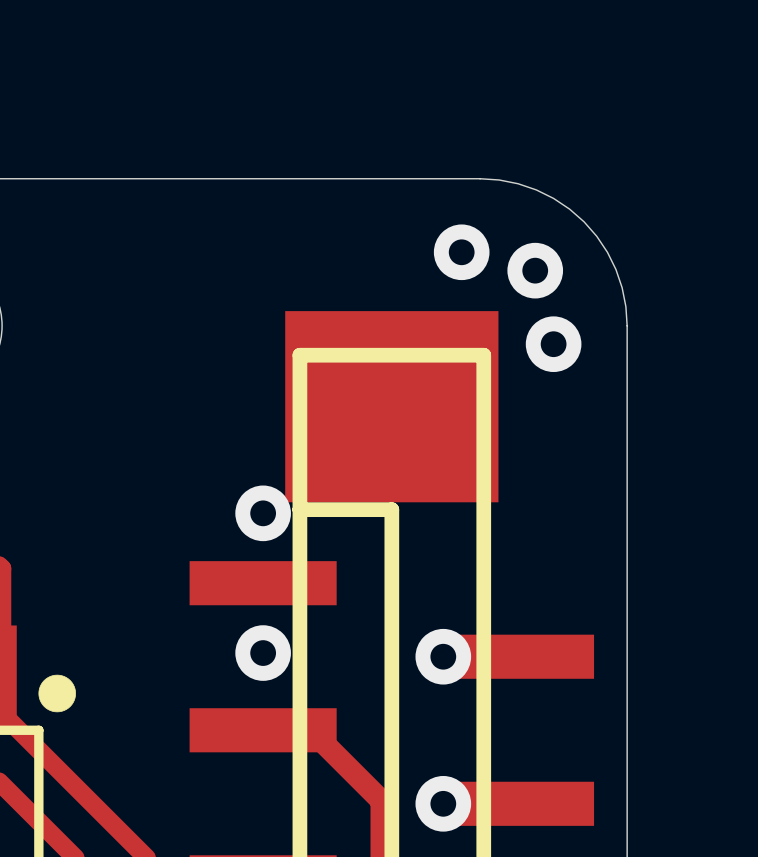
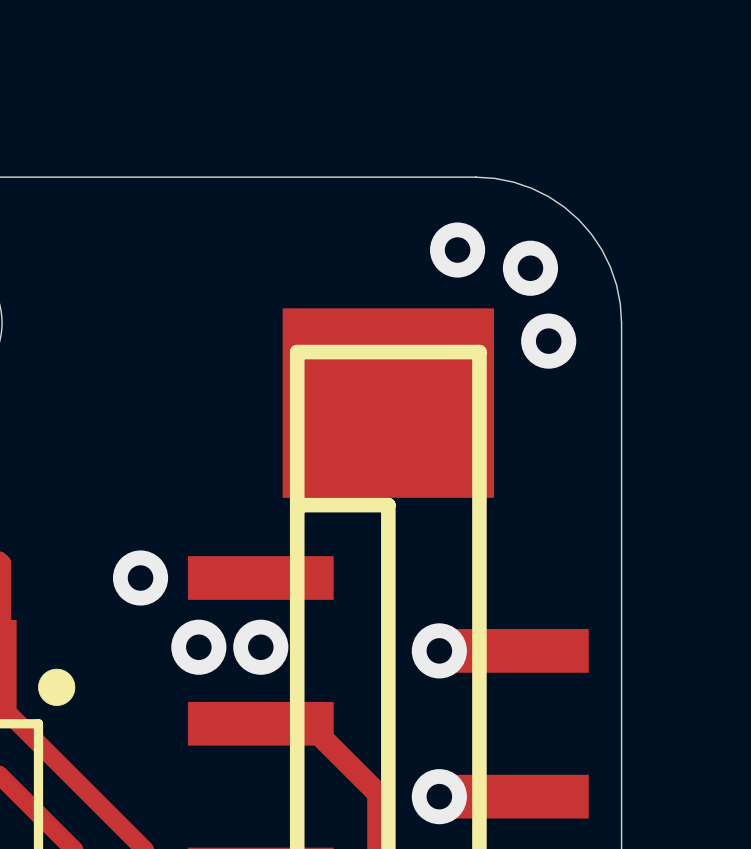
via: (263, 513) -> none
via: none -> (140, 578)
via: none -> (198, 647)

